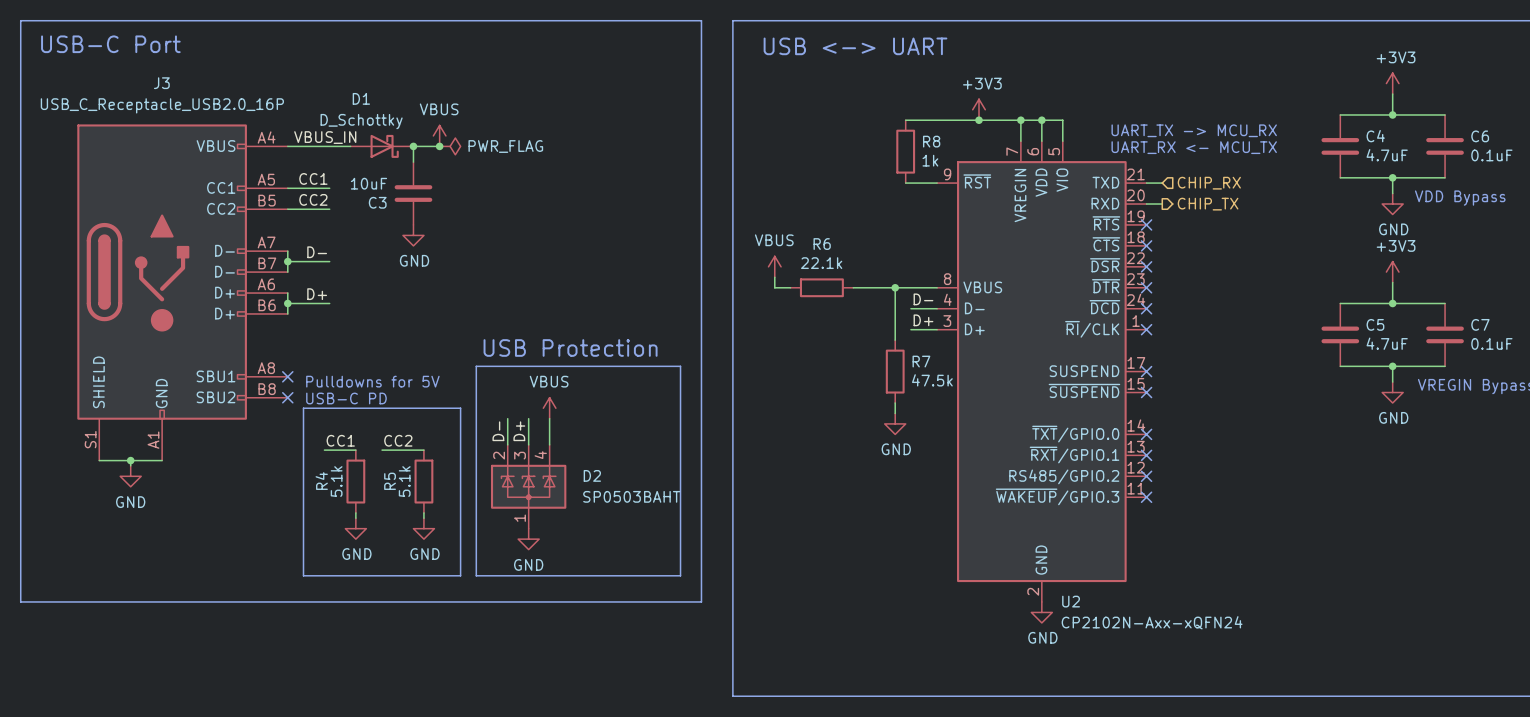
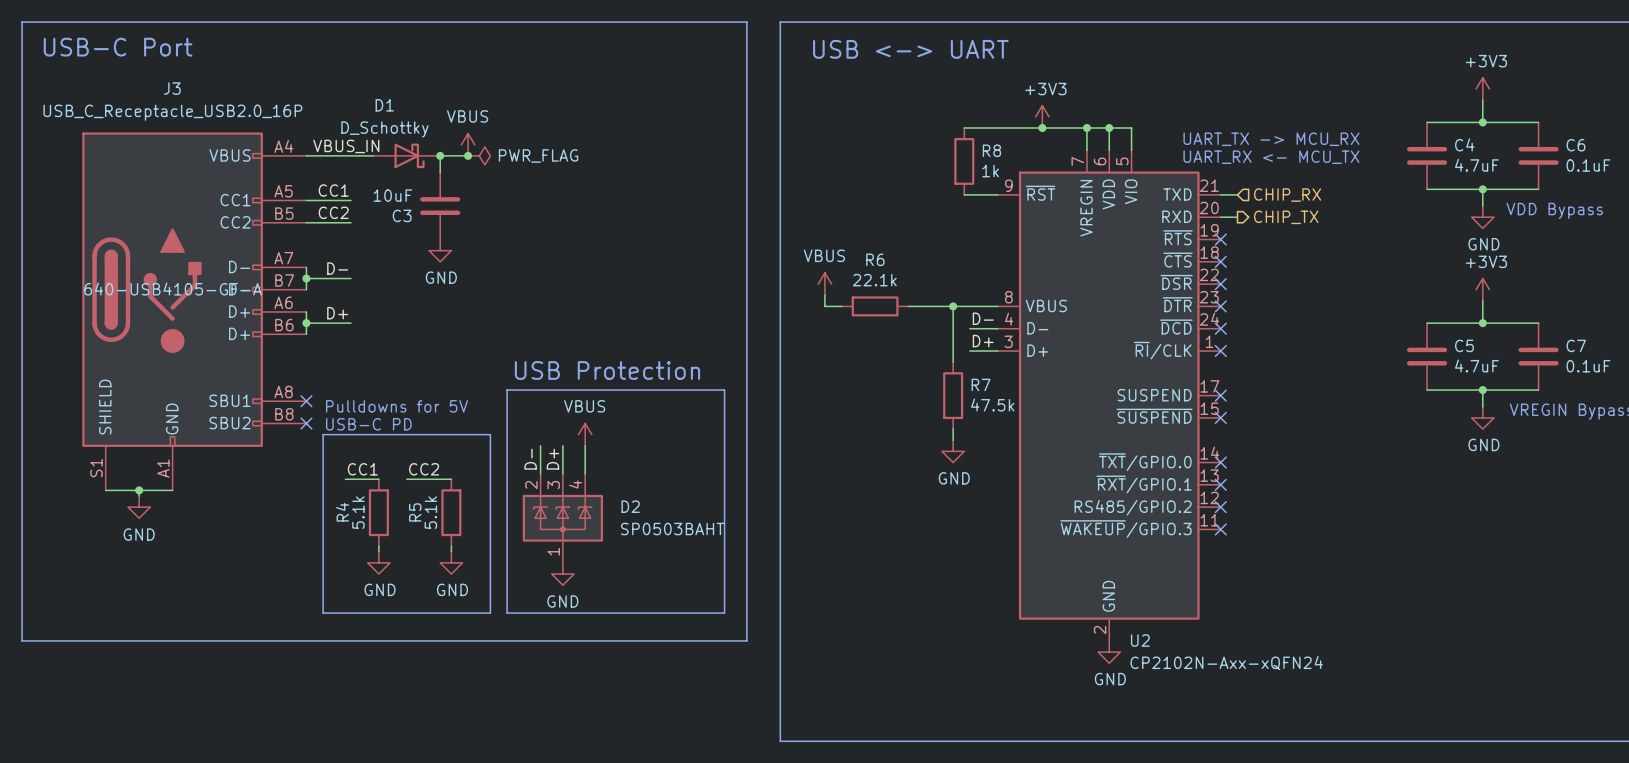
J3 text: none -> 640-USB4105-GF-A (173, 289)

